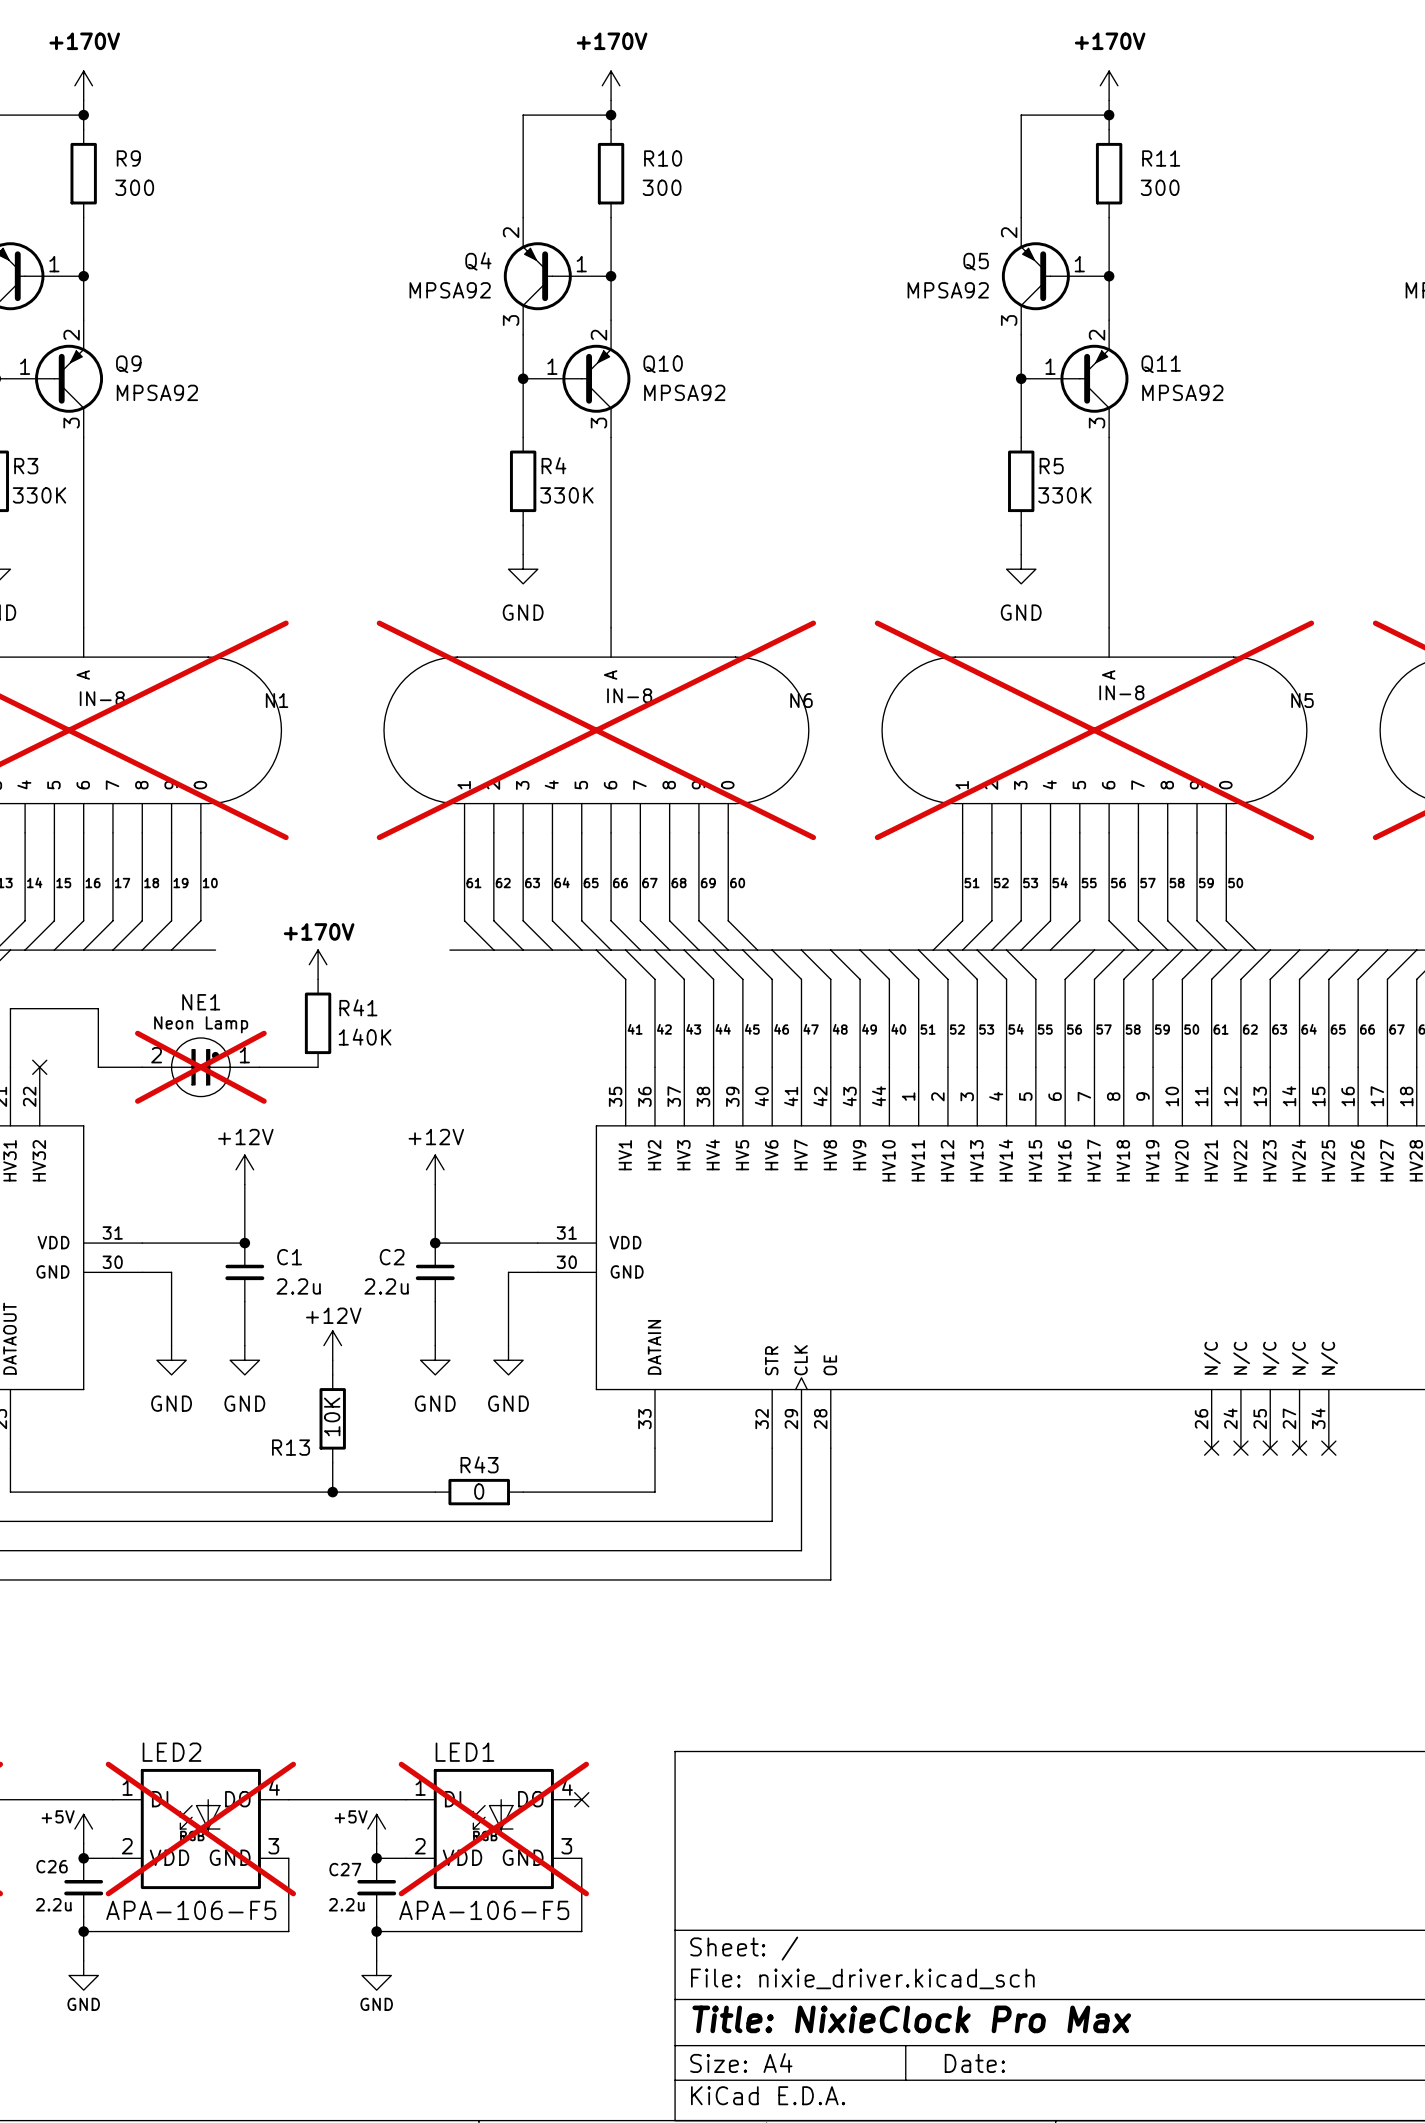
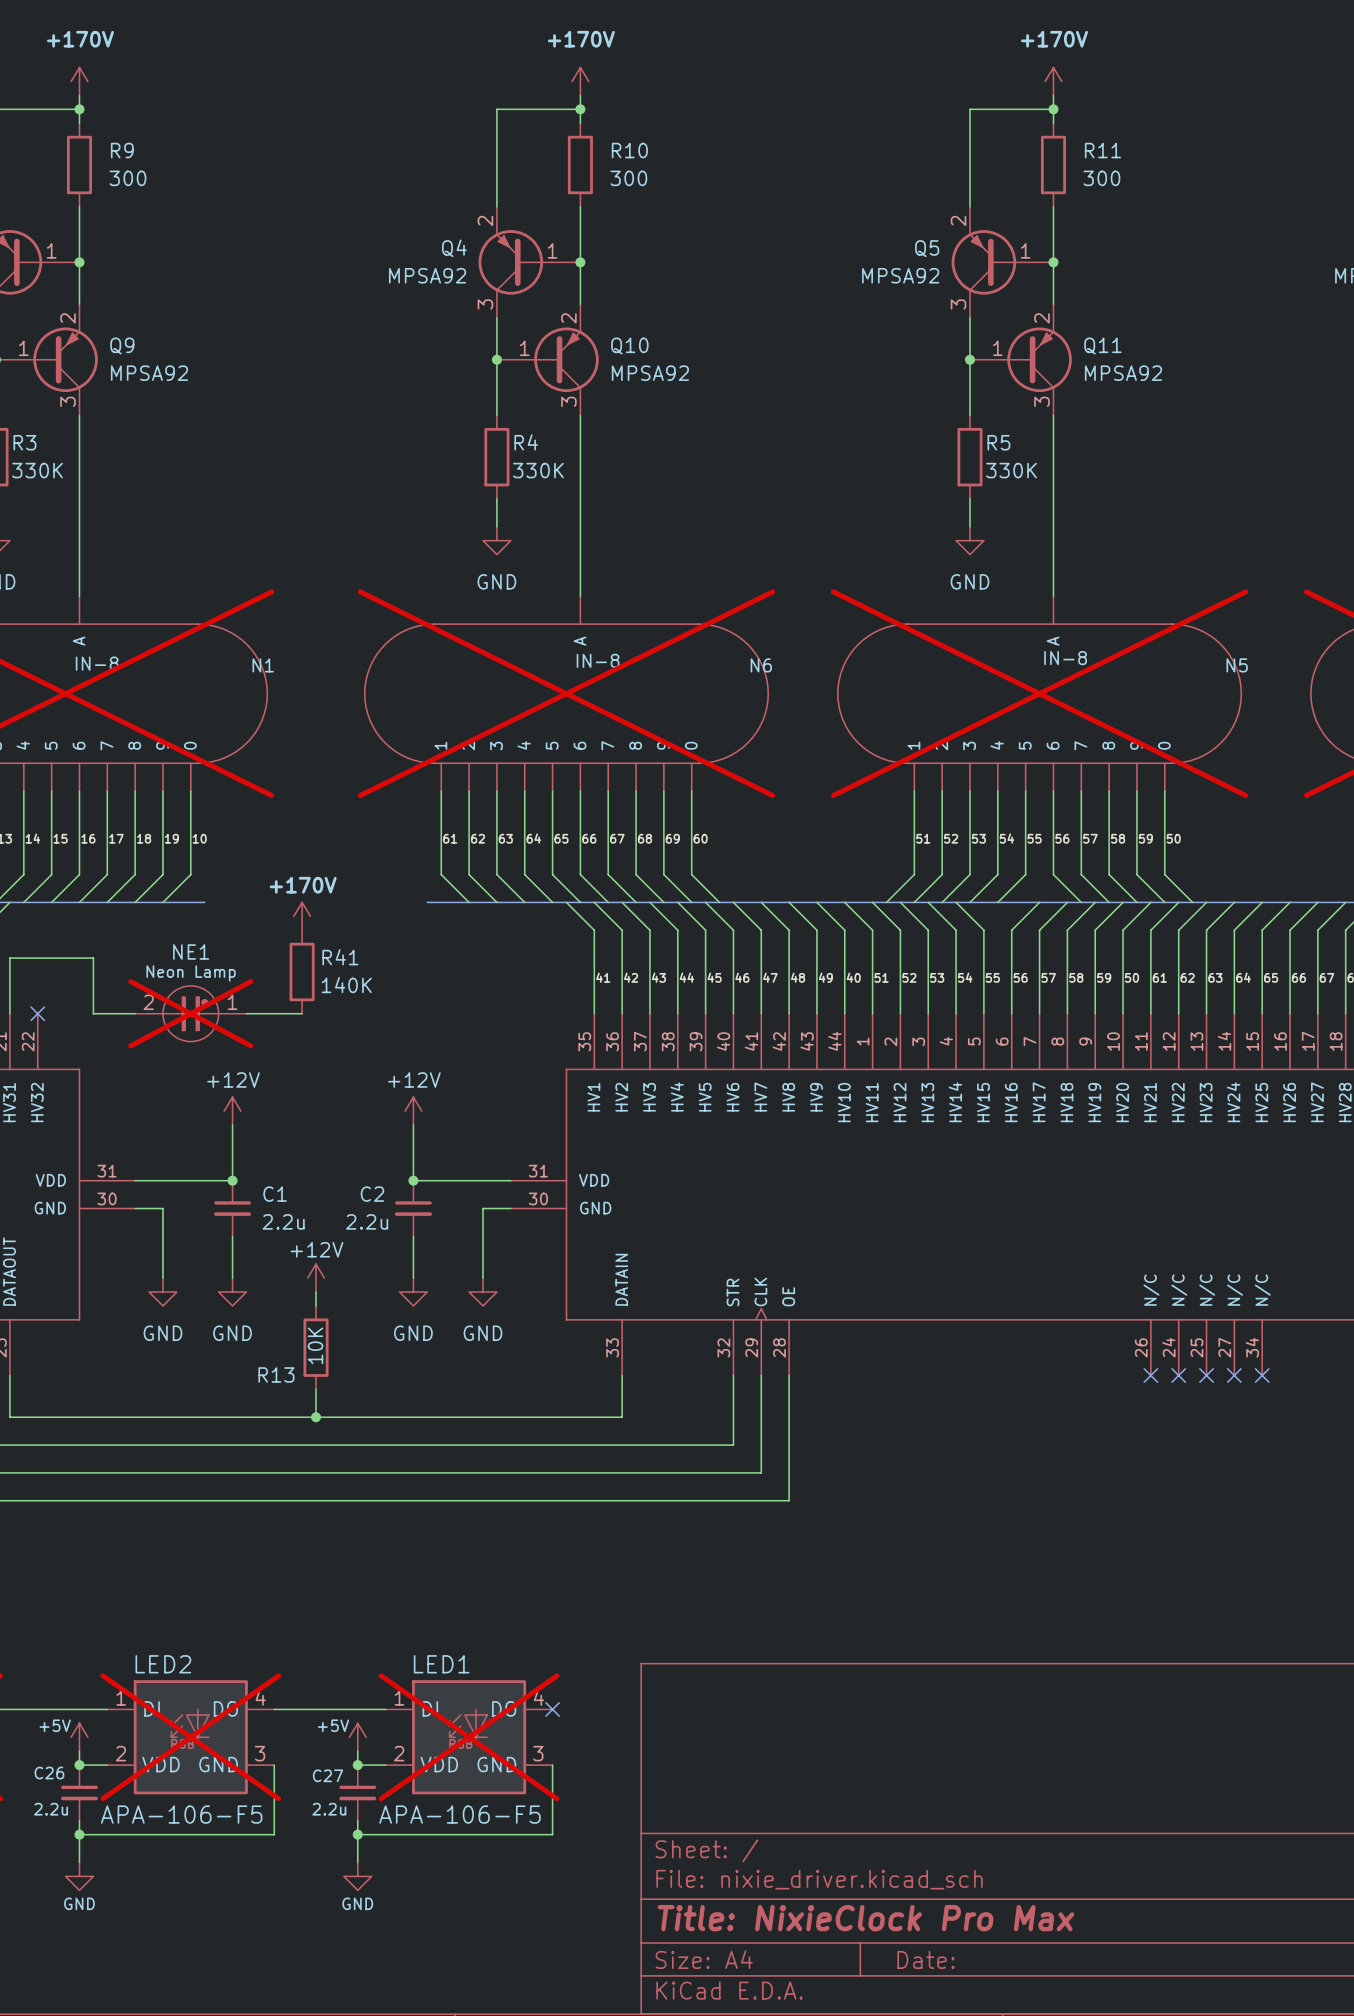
wire: none -> (413, 1417) (496, 1417)
R43: 0 (479, 1492) -> none

